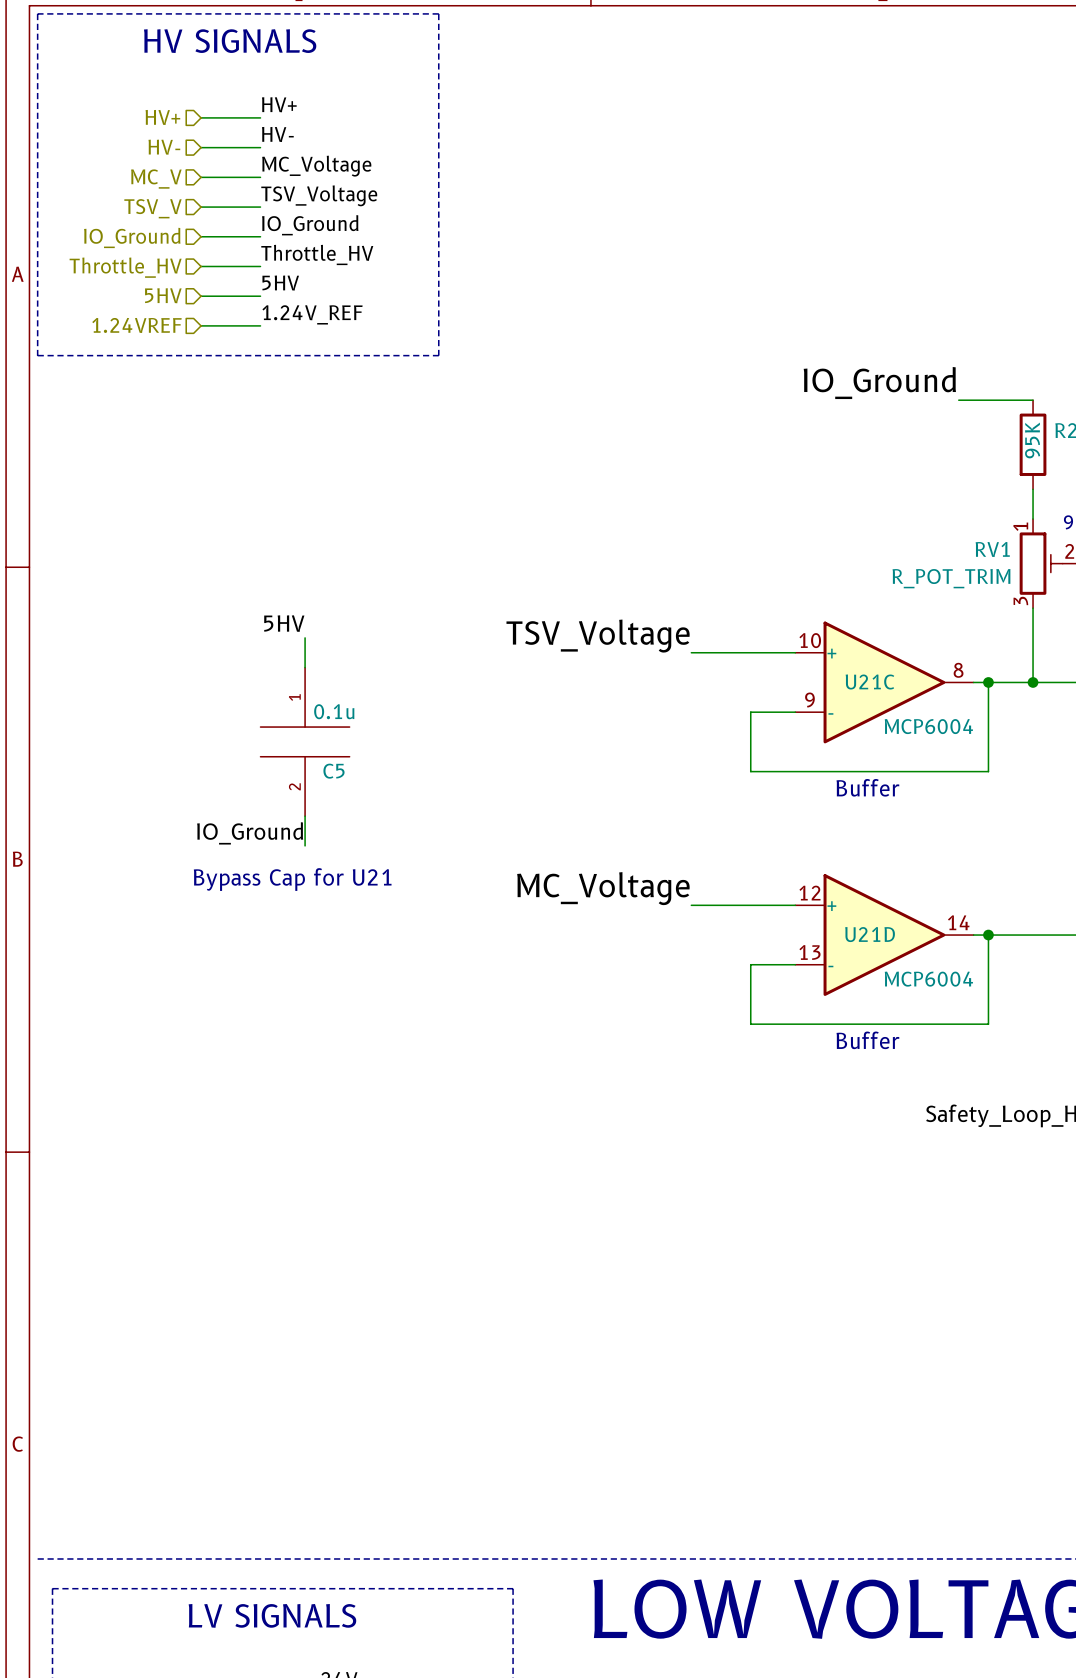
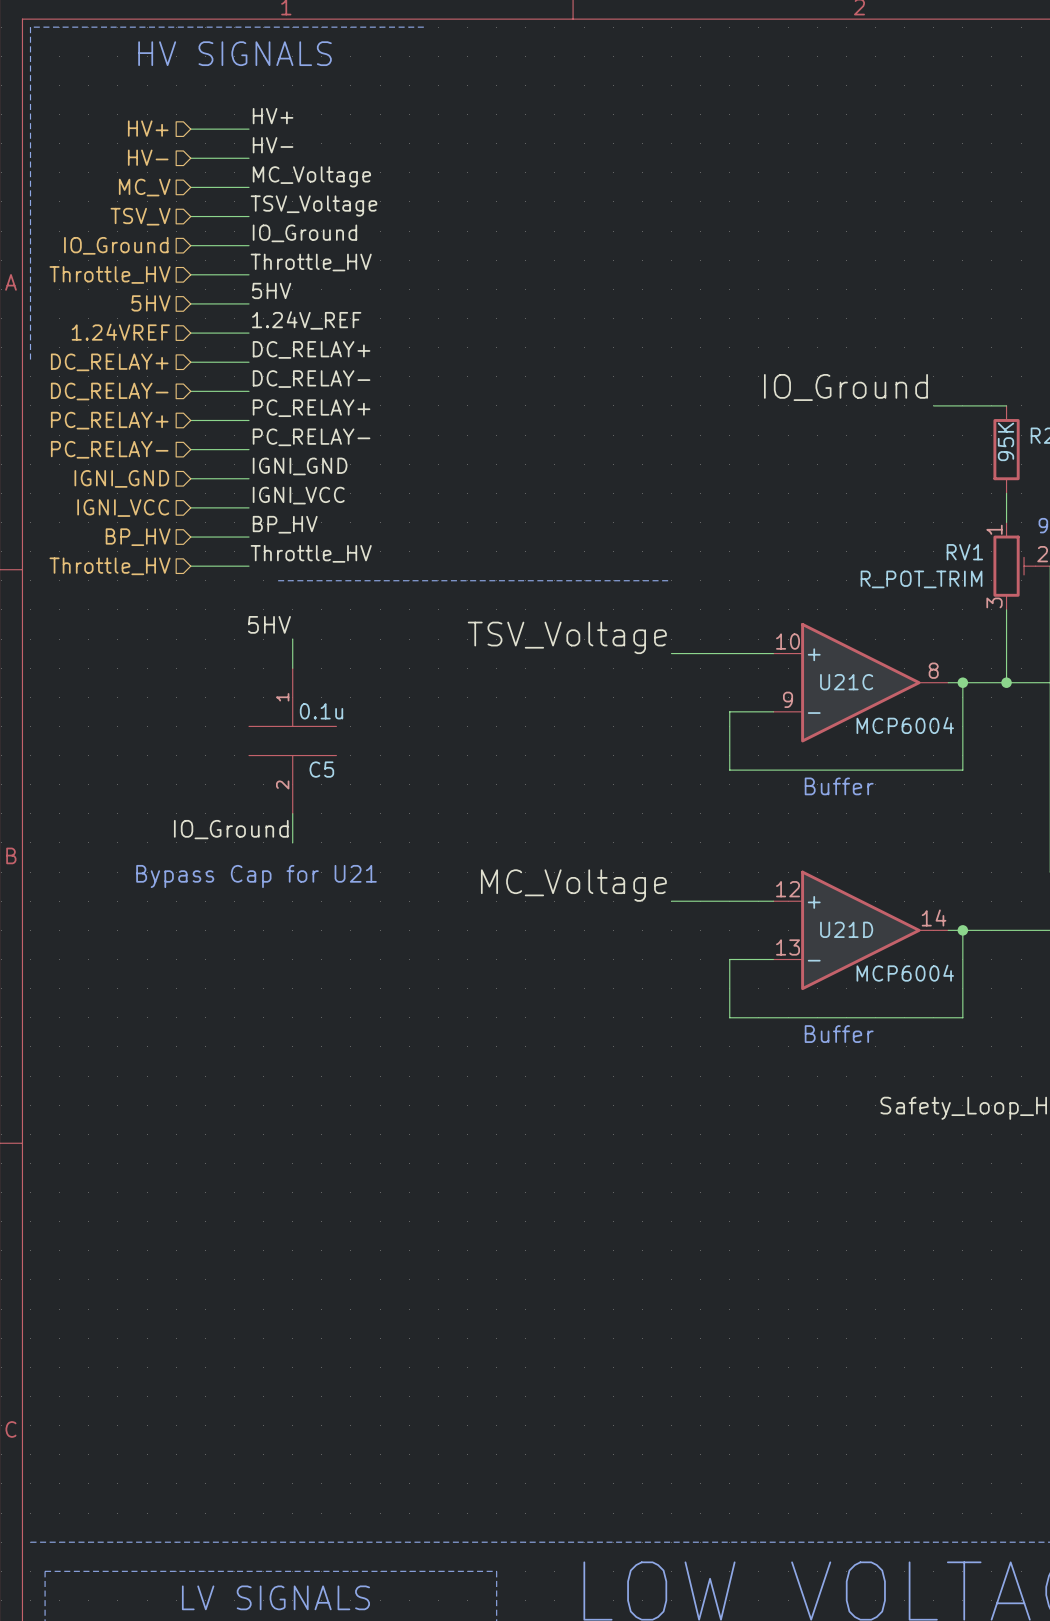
line: (438, 13) (438, 355) (37, 355) -> none
label: none -> DC_RELAY+ (311, 349)
hierarchical label: none -> DC_RELAY+ (109, 362)
label: none -> DC_RELAY- (311, 379)
wire: none -> (190, 391) (249, 391)
hierarchical label: none -> DC_RELAY- (109, 391)
label: none -> PC_RELAY+ (311, 408)
wire: none -> (190, 420) (249, 420)
hierarchical label: none -> PC_RELAY+ (109, 420)
label: none -> PC_RELAY- (311, 437)
wire: none -> (190, 449) (249, 449)
hierarchical label: none -> PC_RELAY- (109, 449)
label: none -> IGNI_GND (300, 466)
wire: none -> (190, 478) (249, 478)
hierarchical label: none -> IGNI_GND (121, 478)
label: none -> IGNI_VCC (298, 495)
wire: none -> (190, 507) (249, 507)
hierarchical label: none -> IGNI_VCC (123, 508)
label: none -> BP_HV (285, 524)
wire: none -> (190, 537) (249, 537)
hierarchical label: none -> BP_HV (138, 537)
label: none -> Throttle_HV (311, 553)
wire: none -> (190, 566) (249, 566)
hierarchical label: none -> Throttle_HV (110, 566)
line: none -> (278, 580) (671, 580)

